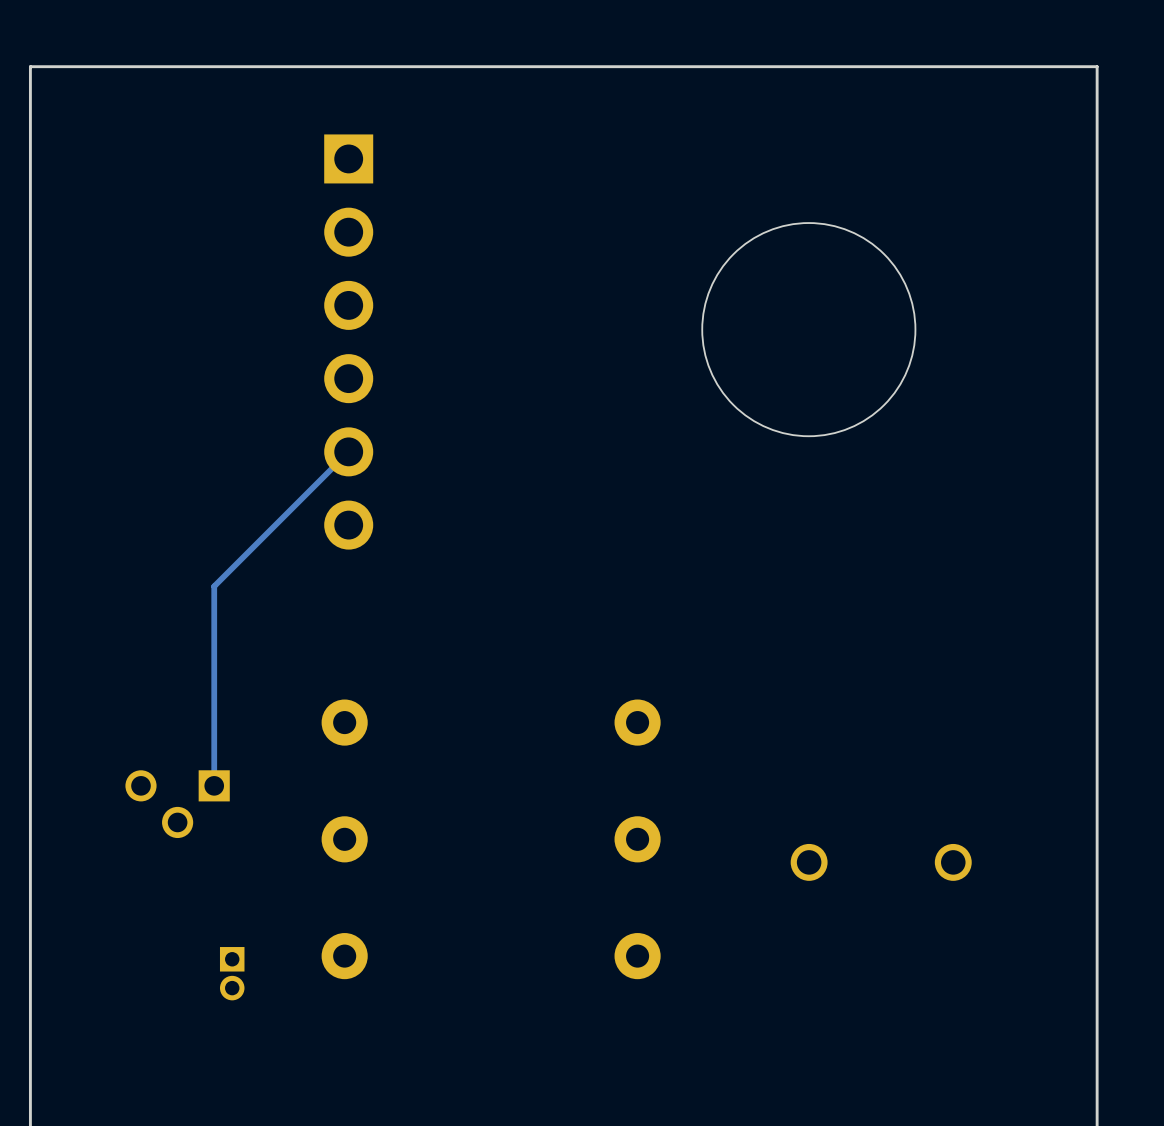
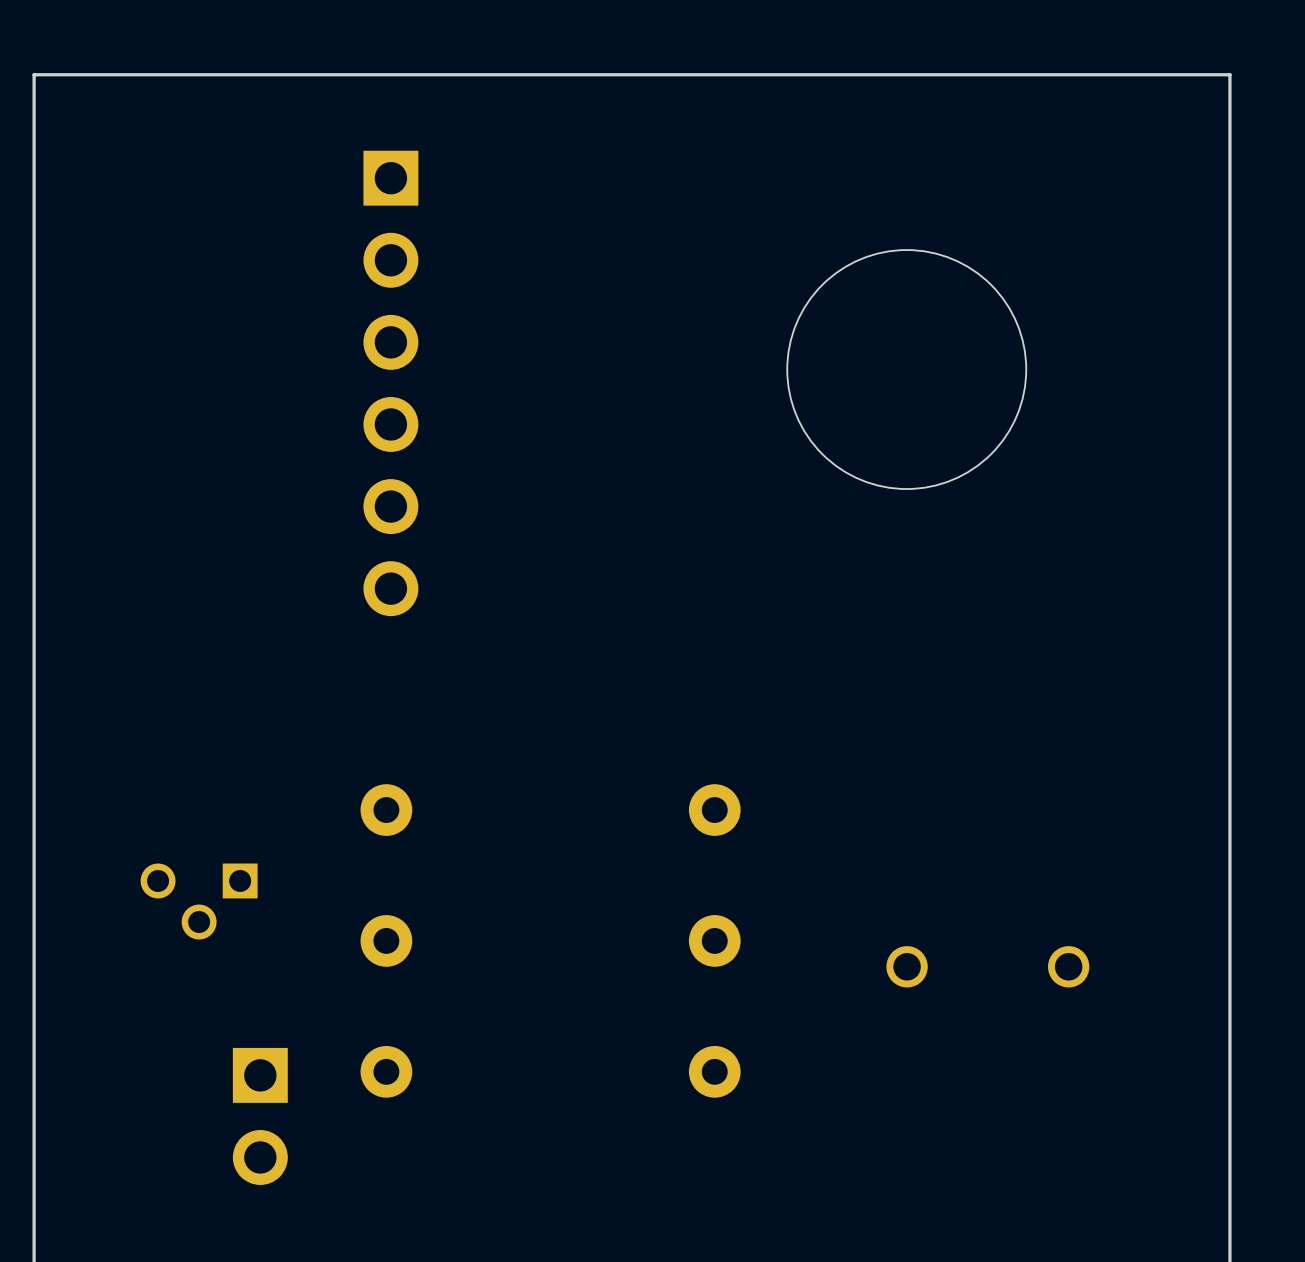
track: (348, 451) (214, 586) (214, 785) -> none
part footprint: [219, 947, 245, 1001] -> [232, 1047, 288, 1185]

